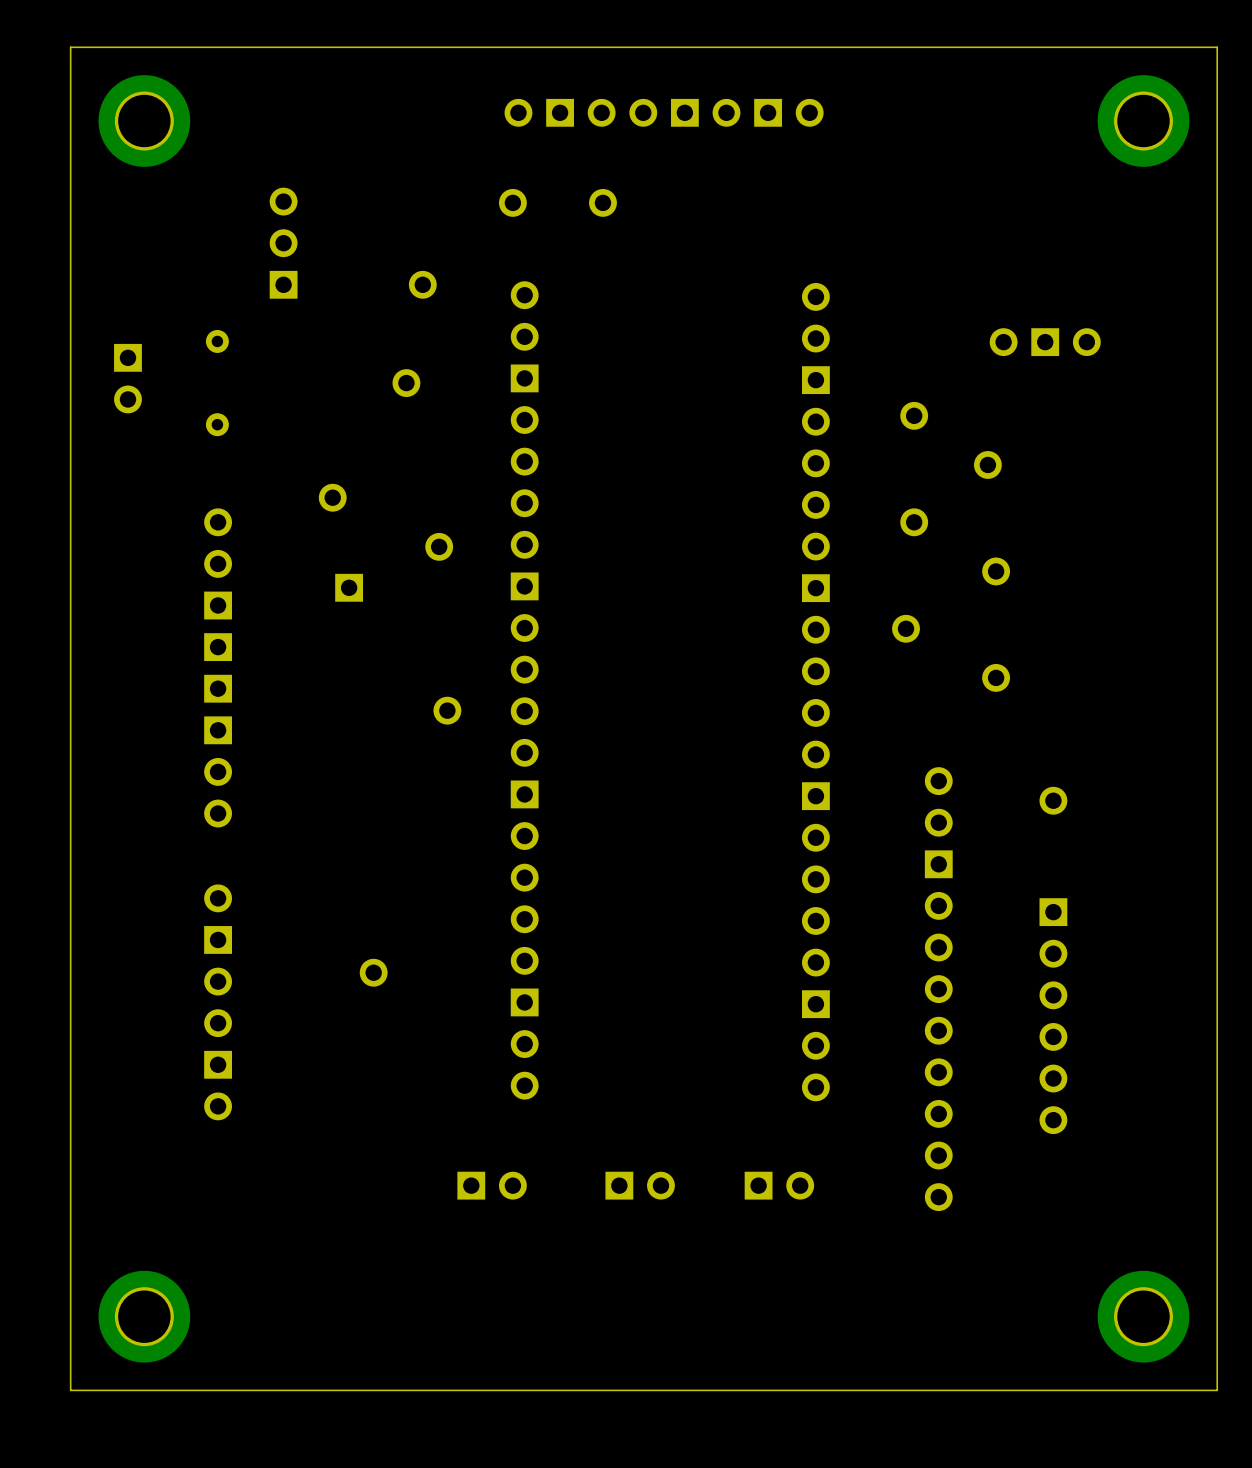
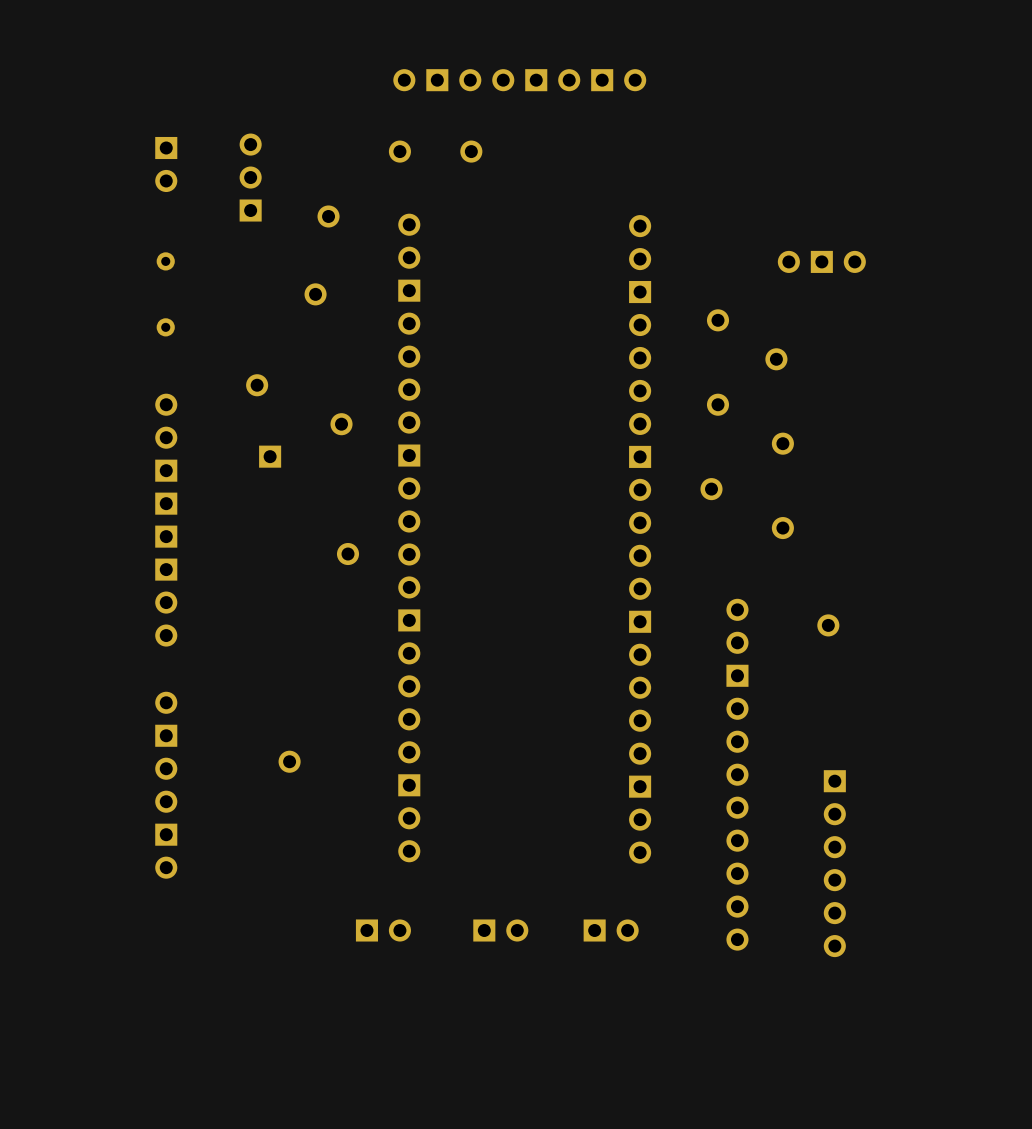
board edge: (1217, 47) (70, 47) (70, 1390) (1217, 1390) (1217, 47) -> none
part: (144, 121) -> none
part: (1143, 121) -> none
part position: (283, 243) -> (250, 177)
part position: (127, 378) -> (166, 164)
part position: (1053, 1016) -> (834, 863)
part: (144, 1316) -> none
part: (1143, 1316) -> none

